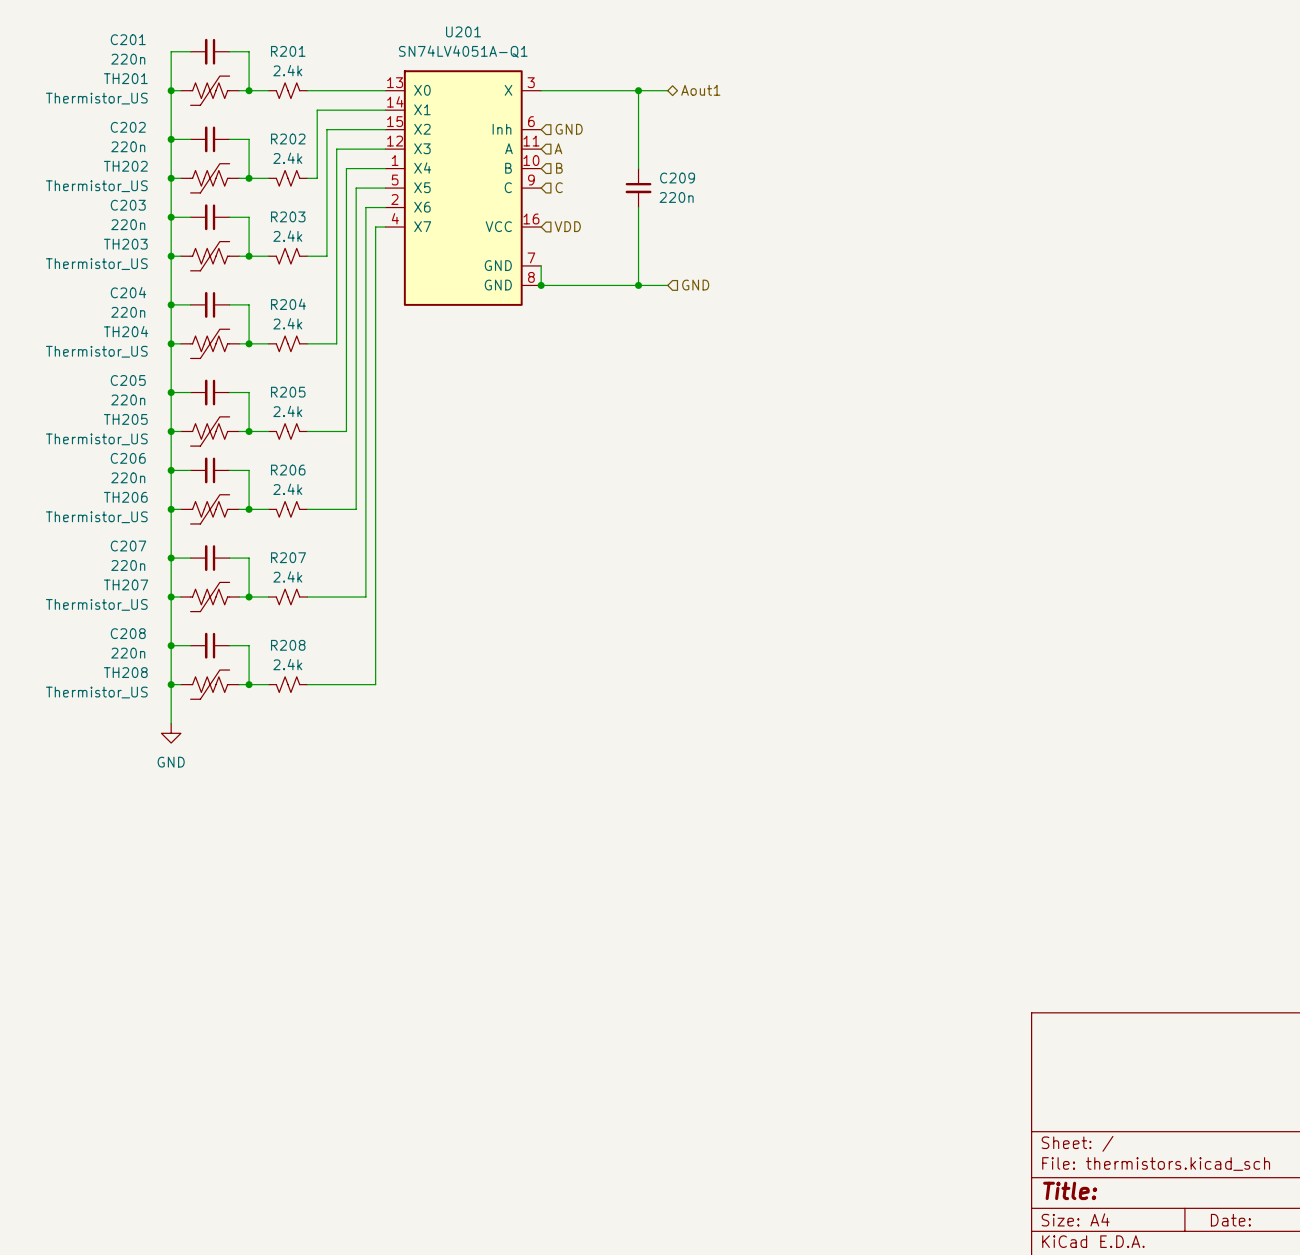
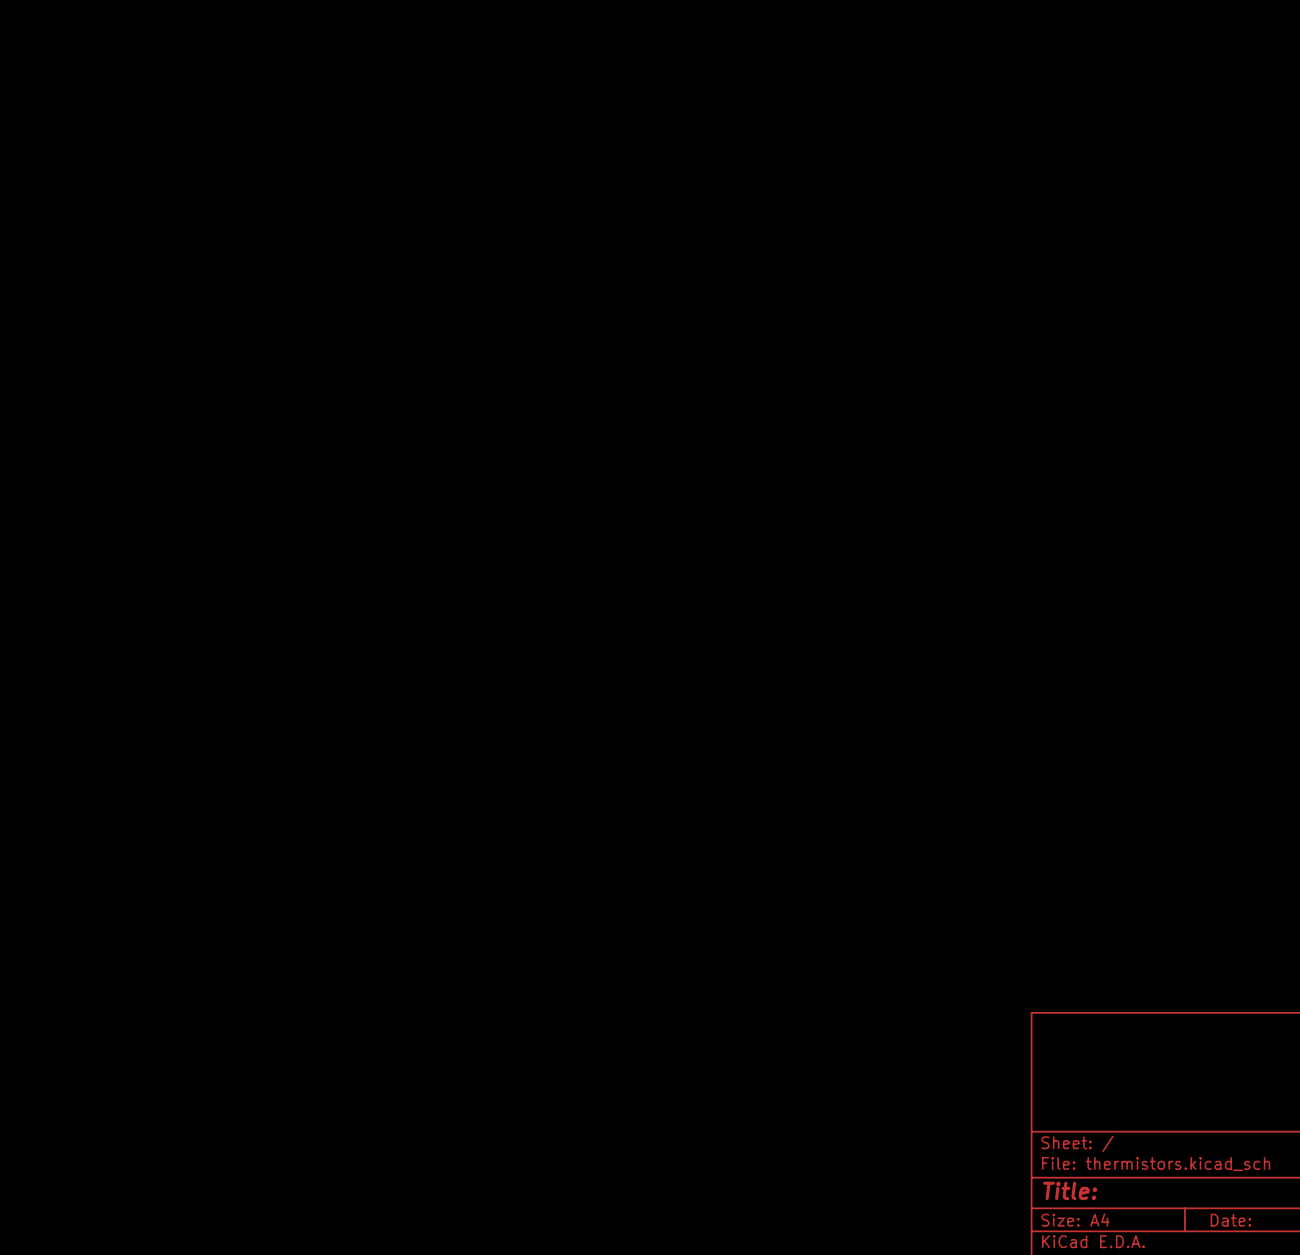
wire: (190, 51) (171, 51) (171, 723) -> none
C201: 220n (210, 51) -> none
wire: (229, 51) (249, 51) (249, 90) -> none
wire: (171, 90) (180, 90) -> none
junction: (171, 90) -> none
TH201: Thermistor_US (210, 90) -> none
wire: (239, 90) (268, 90) -> none
junction: (249, 90) -> none
R201: 2.4k (288, 90) -> none
wire: (307, 90) (385, 90) -> none
wire: (541, 90) (667, 90) -> none
wire: (638, 90) (638, 168) -> none
junction: (638, 90) -> none
hierarchical label: Aout1 (700, 90) -> none
wire: (385, 110) (317, 110) (317, 178) (307, 178) -> none
wire: (385, 129) (326, 129) (326, 256) (307, 256) -> none
hierarchical label: GND (569, 129) -> none
wire: (171, 139) (190, 139) -> none
junction: (171, 139) -> none
C202: 220n (210, 139) -> none
wire: (229, 139) (249, 139) (249, 178) -> none
hierarchical label: A (558, 148) -> none
wire: (385, 149) (336, 149) (336, 343) (307, 343) -> none
wire: (385, 168) (346, 168) (346, 431) (307, 431) -> none
hierarchical label: B (559, 168) -> none
wire: (171, 178) (180, 178) -> none
junction: (171, 178) -> none
TH202: Thermistor_US (210, 178) -> none
wire: (239, 178) (268, 178) -> none
junction: (249, 178) -> none
R202: 2.4k (288, 178) -> none
hierarchical label: C (559, 187) -> none
wire: (385, 188) (356, 188) (356, 509) (307, 509) -> none
U201: SN74LV4051A-Q1 (463, 188) -> none
C209: 220n (638, 188) -> none
wire: (385, 207) (365, 207) (365, 597) (307, 597) -> none
wire: (638, 207) (638, 285) -> none
wire: (171, 217) (190, 217) -> none
junction: (171, 217) -> none
C203: 220n (210, 217) -> none
wire: (229, 217) (249, 217) (249, 256) -> none
hierarchical label: VDD (567, 226) -> none
wire: (385, 227) (375, 227) (375, 684) (307, 684) -> none
wire: (171, 256) (180, 256) -> none
junction: (171, 256) -> none
TH203: Thermistor_US (210, 256) -> none
wire: (239, 256) (268, 256) -> none
junction: (249, 256) -> none
R203: 2.4k (288, 256) -> none
wire: (541, 265) (541, 285) (667, 285) -> none
junction: (541, 285) -> none
junction: (638, 285) -> none
hierarchical label: GND (695, 285) -> none
wire: (171, 304) (190, 304) -> none
junction: (171, 304) -> none
C204: 220n (210, 304) -> none
wire: (229, 304) (249, 304) (249, 343) -> none
wire: (171, 343) (180, 343) -> none
junction: (171, 343) -> none
TH204: Thermistor_US (210, 343) -> none
wire: (239, 343) (268, 343) -> none
junction: (249, 343) -> none
R204: 2.4k (288, 343) -> none
wire: (171, 392) (190, 392) -> none
junction: (171, 392) -> none
C205: 220n (210, 392) -> none
wire: (229, 392) (249, 392) (249, 431) -> none
wire: (171, 431) (180, 431) -> none
junction: (171, 431) -> none
TH205: Thermistor_US (210, 431) -> none
wire: (239, 431) (268, 431) -> none
junction: (249, 431) -> none
R205: 2.4k (288, 431) -> none
wire: (171, 470) (190, 470) -> none
junction: (171, 470) -> none
C206: 220n (210, 470) -> none
wire: (229, 470) (249, 470) (249, 509) -> none
wire: (171, 509) (180, 509) -> none
junction: (171, 509) -> none
TH206: Thermistor_US (210, 509) -> none
wire: (239, 509) (268, 509) -> none
junction: (249, 509) -> none
R206: 2.4k (288, 509) -> none
wire: (171, 558) (190, 558) -> none
junction: (171, 558) -> none
C207: 220n (210, 558) -> none
wire: (229, 558) (249, 558) (249, 597) -> none
wire: (171, 597) (180, 597) -> none
junction: (171, 597) -> none
TH207: Thermistor_US (210, 597) -> none
wire: (239, 597) (268, 597) -> none
junction: (249, 597) -> none
R207: 2.4k (288, 597) -> none
wire: (171, 645) (190, 645) -> none
junction: (171, 645) -> none
C208: 220n (210, 645) -> none
wire: (229, 645) (249, 645) (249, 684) -> none
wire: (171, 684) (180, 684) -> none
junction: (171, 684) -> none
TH208: Thermistor_US (210, 684) -> none
wire: (239, 684) (268, 684) -> none
junction: (249, 684) -> none
R208: 2.4k (288, 684) -> none
power symbol: GND (171, 733) -> none

